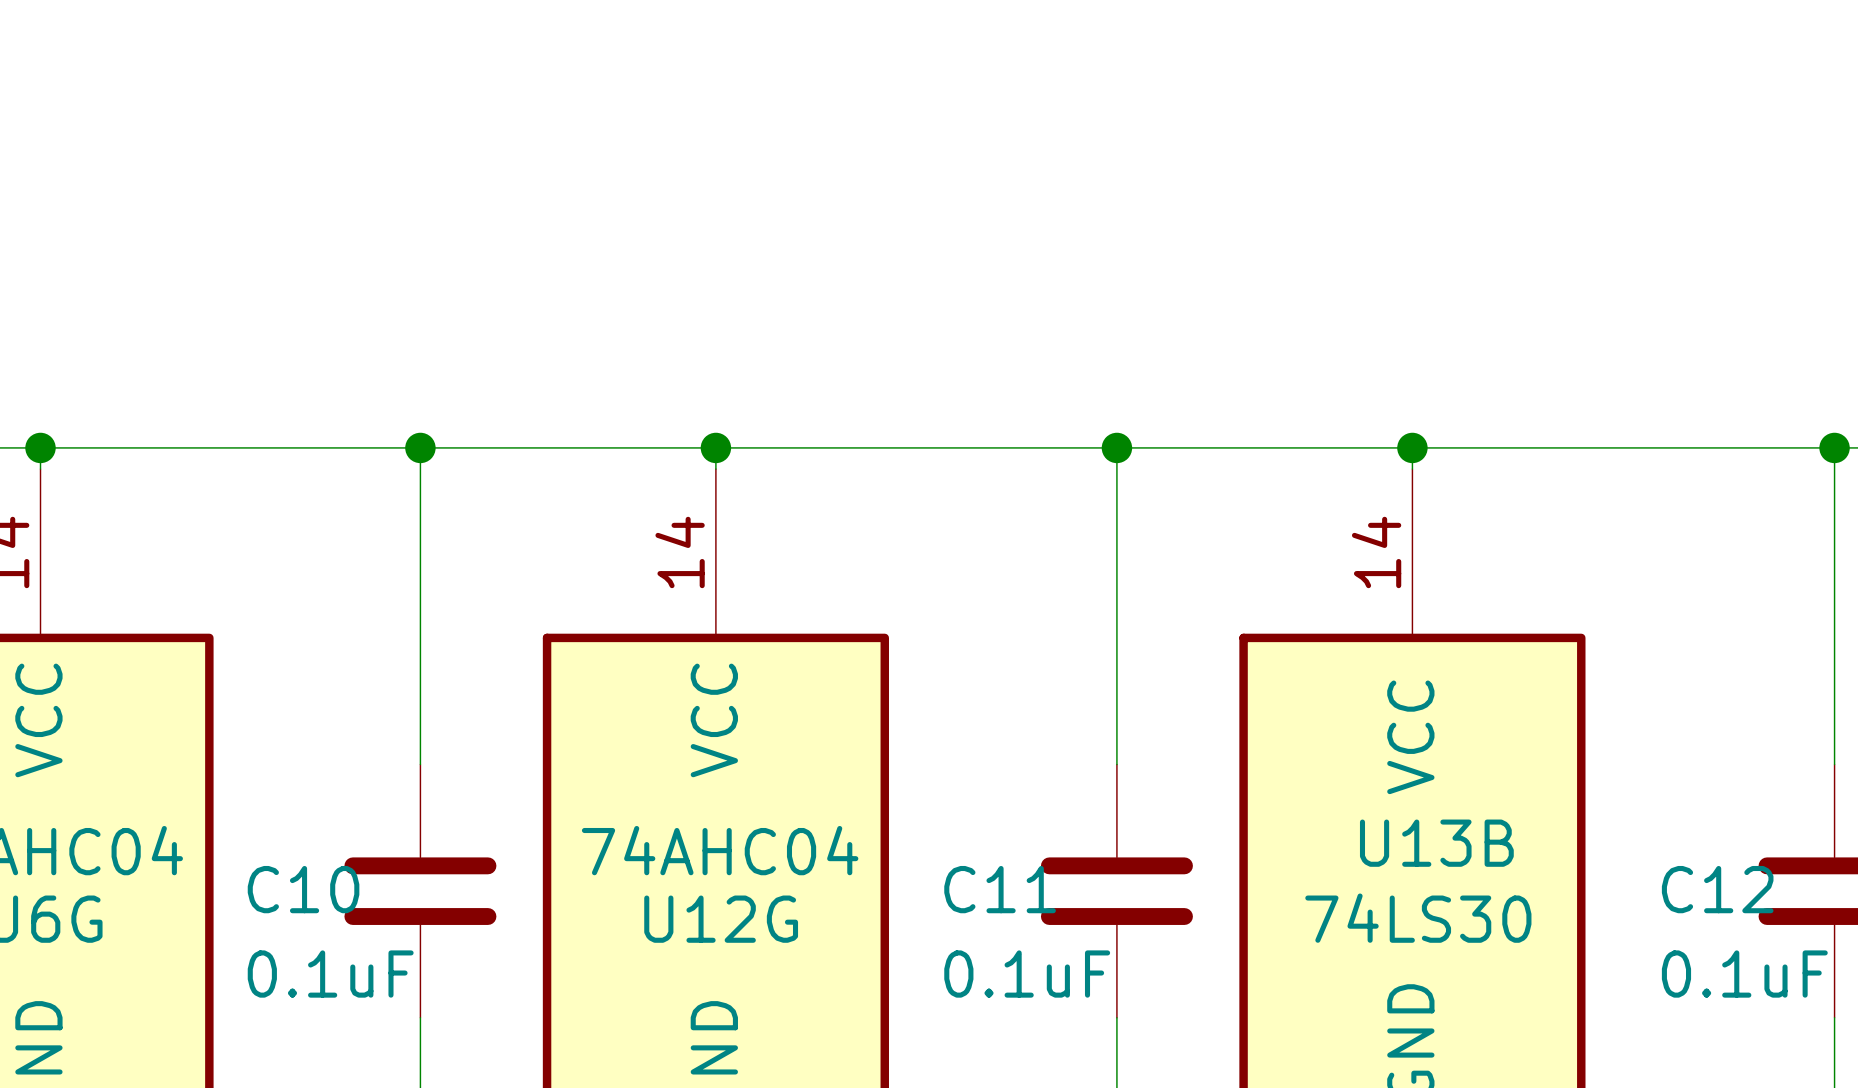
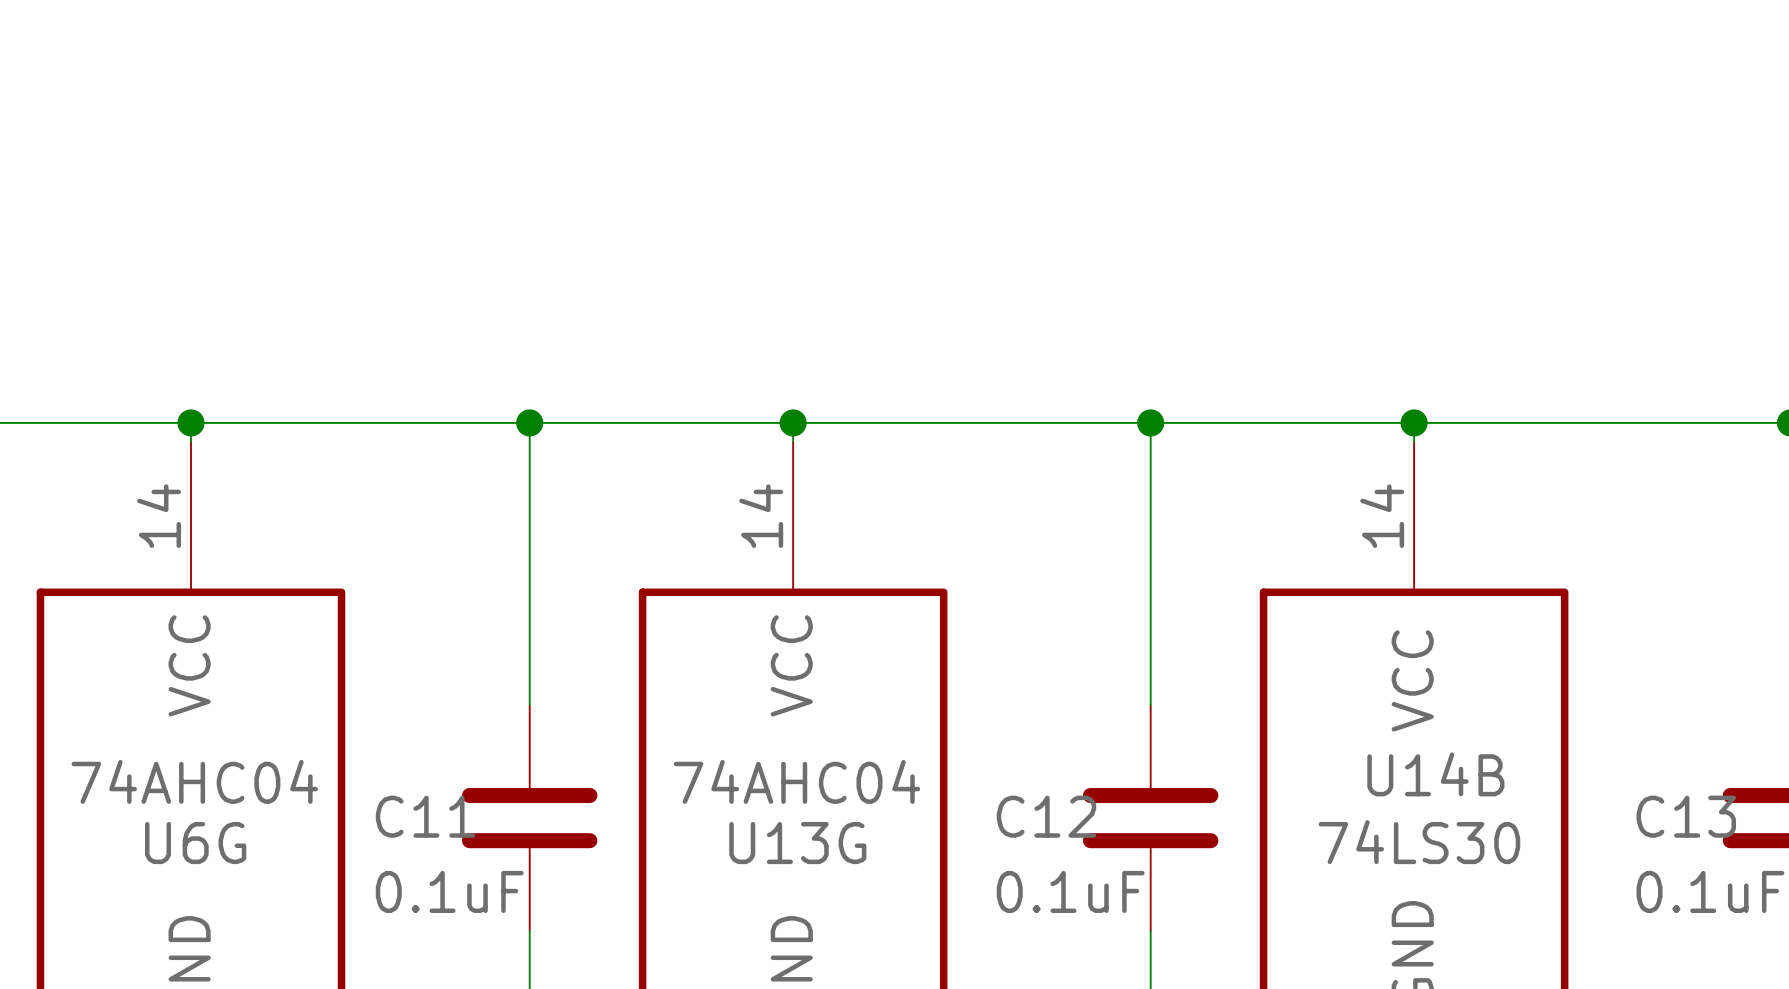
U13B name: U13B (1436, 843) -> U14B (1435, 774)
C10 name: C10 (303, 889) -> C11 (425, 816)
C11 name: C11 (1000, 889) -> C12 (1046, 816)
C12 name: C12 (1717, 889) -> C13 (1686, 816)
U12G name: U12G (721, 919) -> U13G (797, 843)

